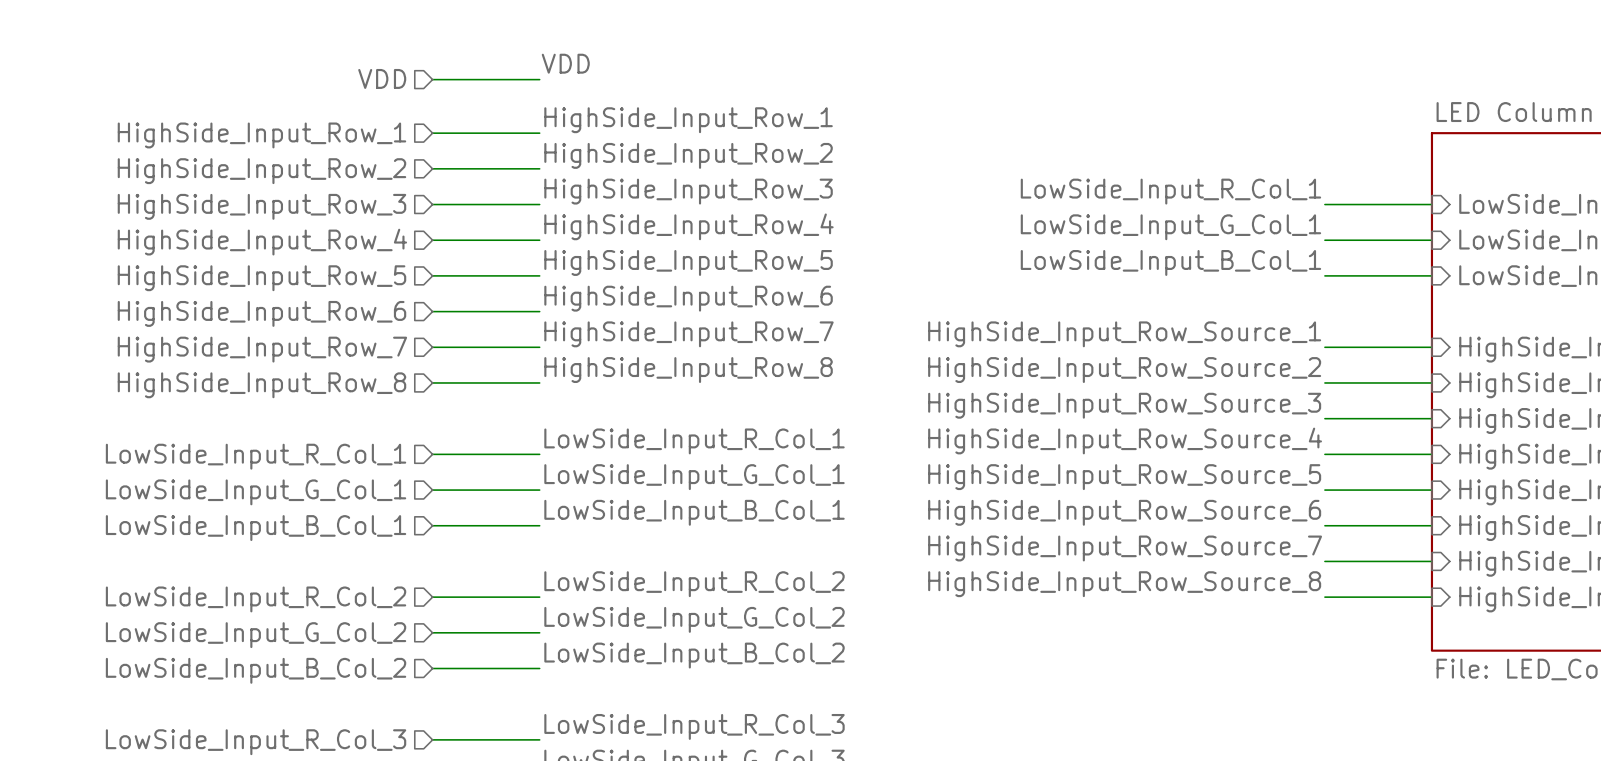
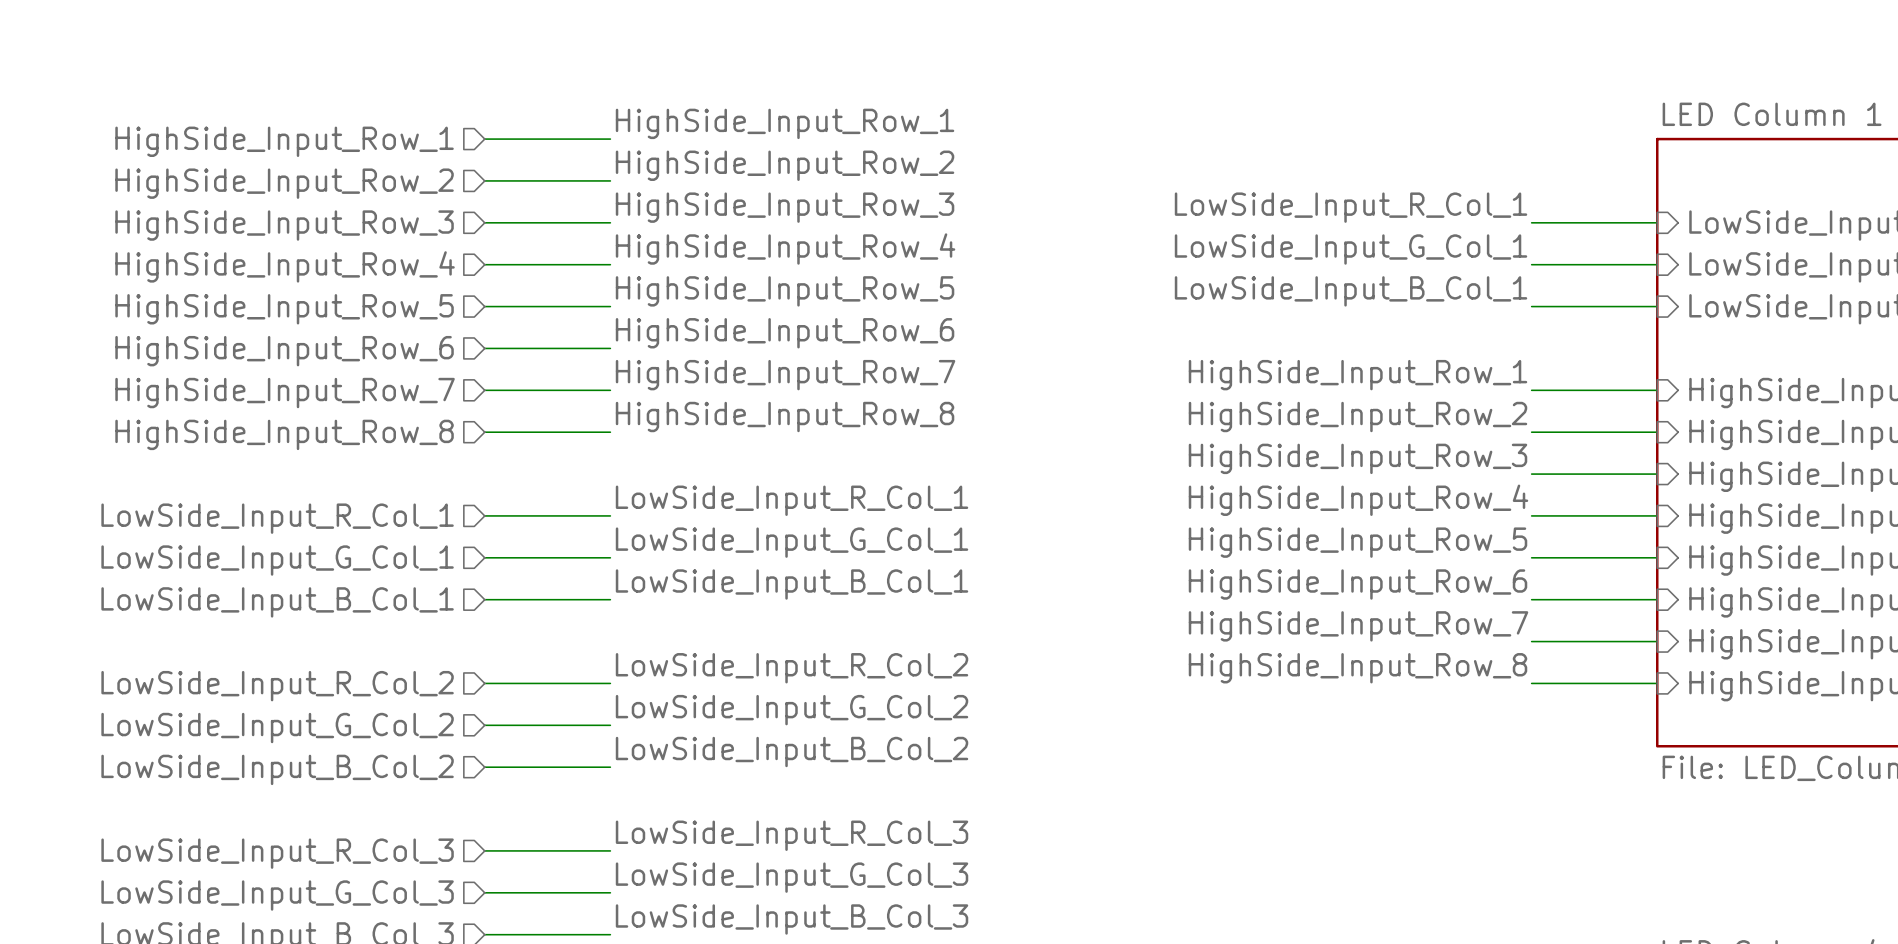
label: VDD (565, 63) -> none
hierarchical label: VDD (382, 78) -> none
wire: (432, 79) (539, 79) -> none
label: HighSide_Input_Row_Source_1 (1124, 334) -> HighSide_Input_Row_1 (1358, 375)
label: HighSide_Input_Row_Source_2 (1124, 370) -> HighSide_Input_Row_2 (1358, 417)
label: HighSide_Input_Row_Source_3 (1124, 405) -> HighSide_Input_Row_3 (1358, 458)
label: HighSide_Input_Row_Source_4 (1125, 440) -> HighSide_Input_Row_4 (1358, 500)
label: HighSide_Input_Row_Source_5 (1124, 477) -> HighSide_Input_Row_5 (1358, 542)
label: HighSide_Input_Row_Source_6 (1124, 512) -> HighSide_Input_Row_6 (1358, 584)
label: HighSide_Input_Row_Source_7 (1125, 548) -> HighSide_Input_Row_7 (1358, 626)
label: HighSide_Input_Row_Source_8 (1124, 584) -> HighSide_Input_Row_8 (1358, 668)

